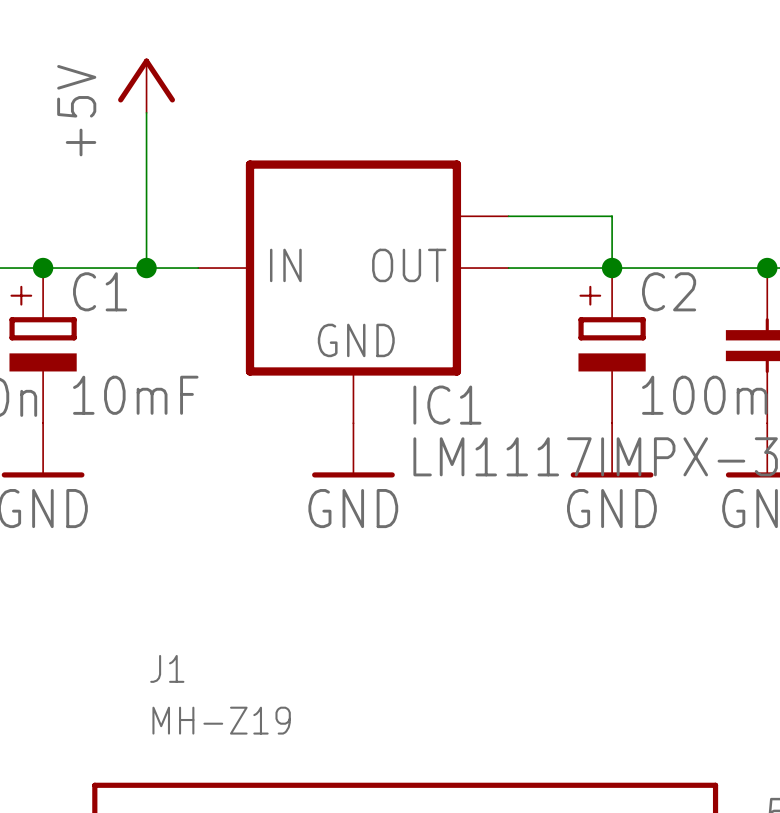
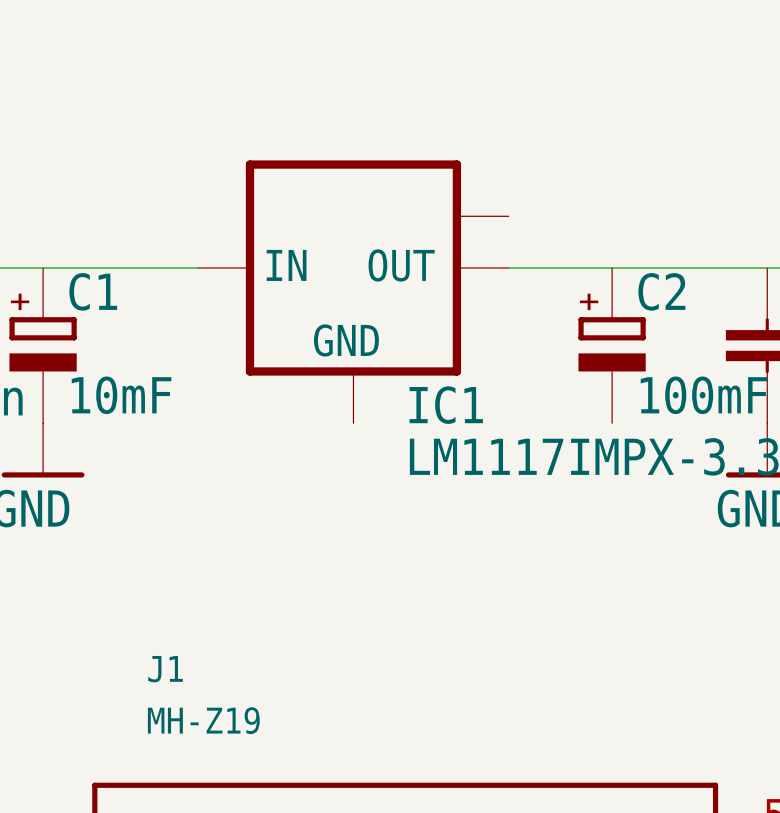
power symbol: +5V (146, 85) -> none
wire: (146, 112) (146, 268) -> none
wire: (508, 216) (612, 216) (612, 268) -> none
junction: (43, 268) -> none
junction: (146, 268) -> none
junction: (612, 268) -> none
junction: (767, 268) -> none
power symbol: GND (353, 450) -> none
power symbol: GND (612, 450) -> none

